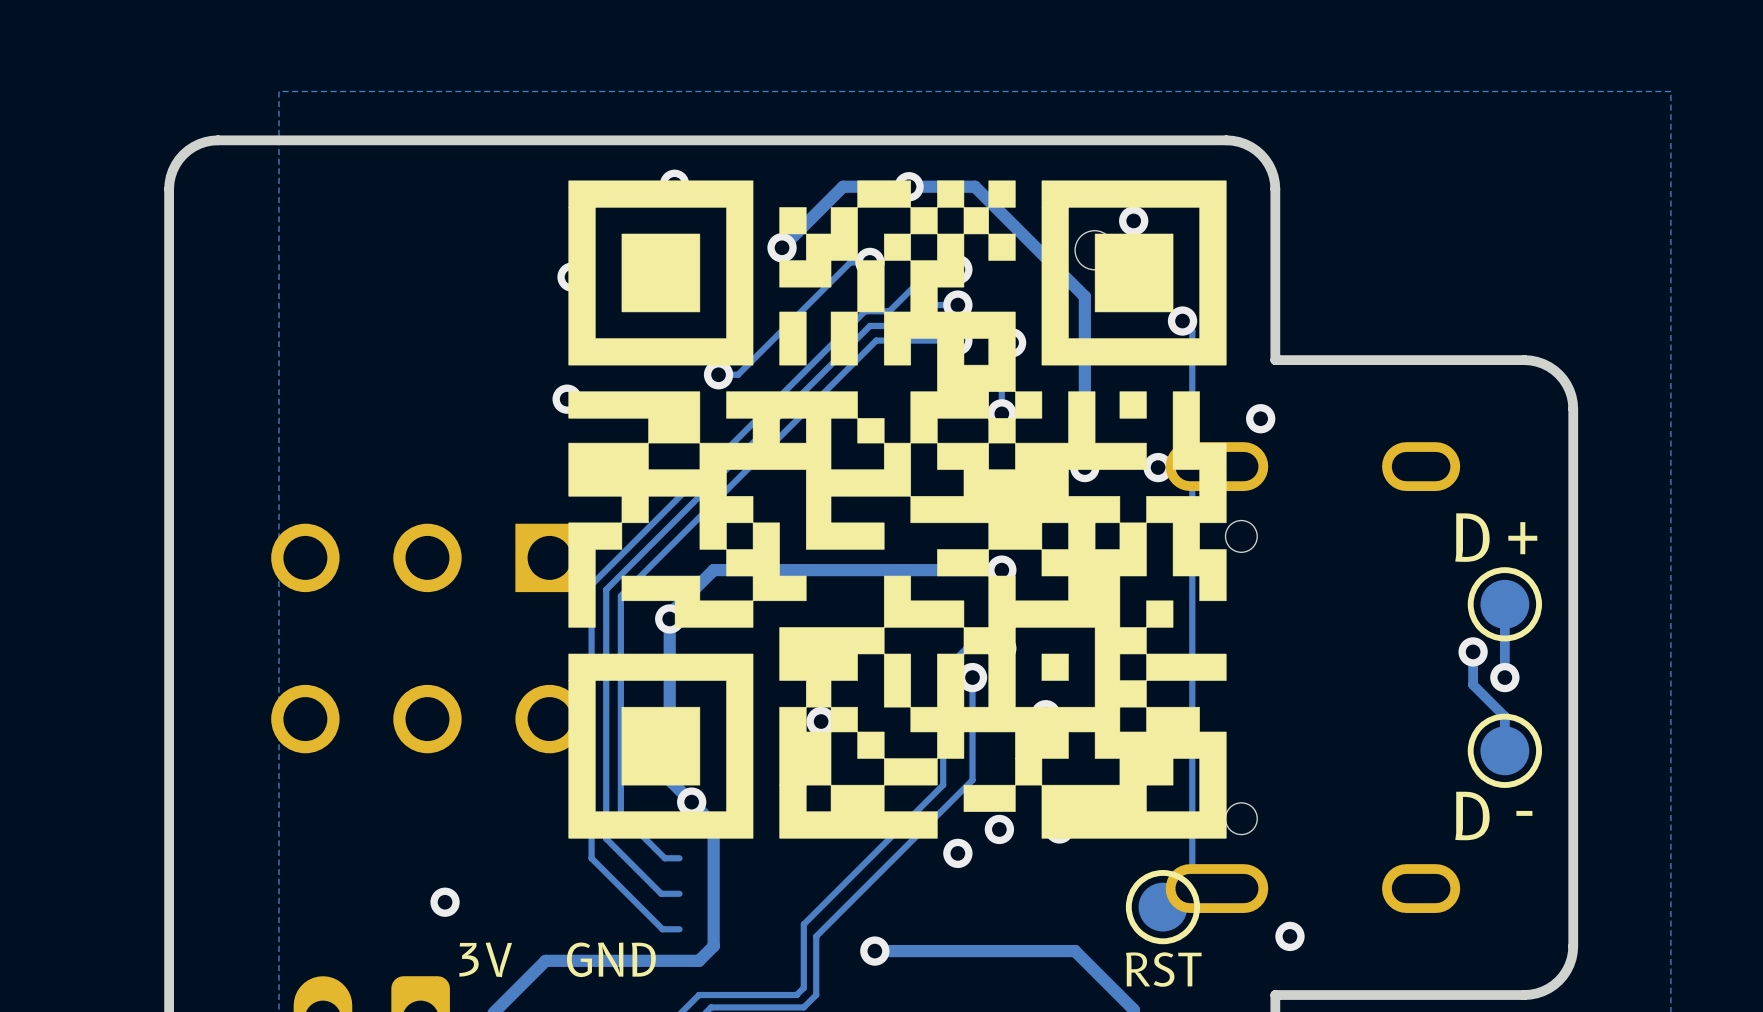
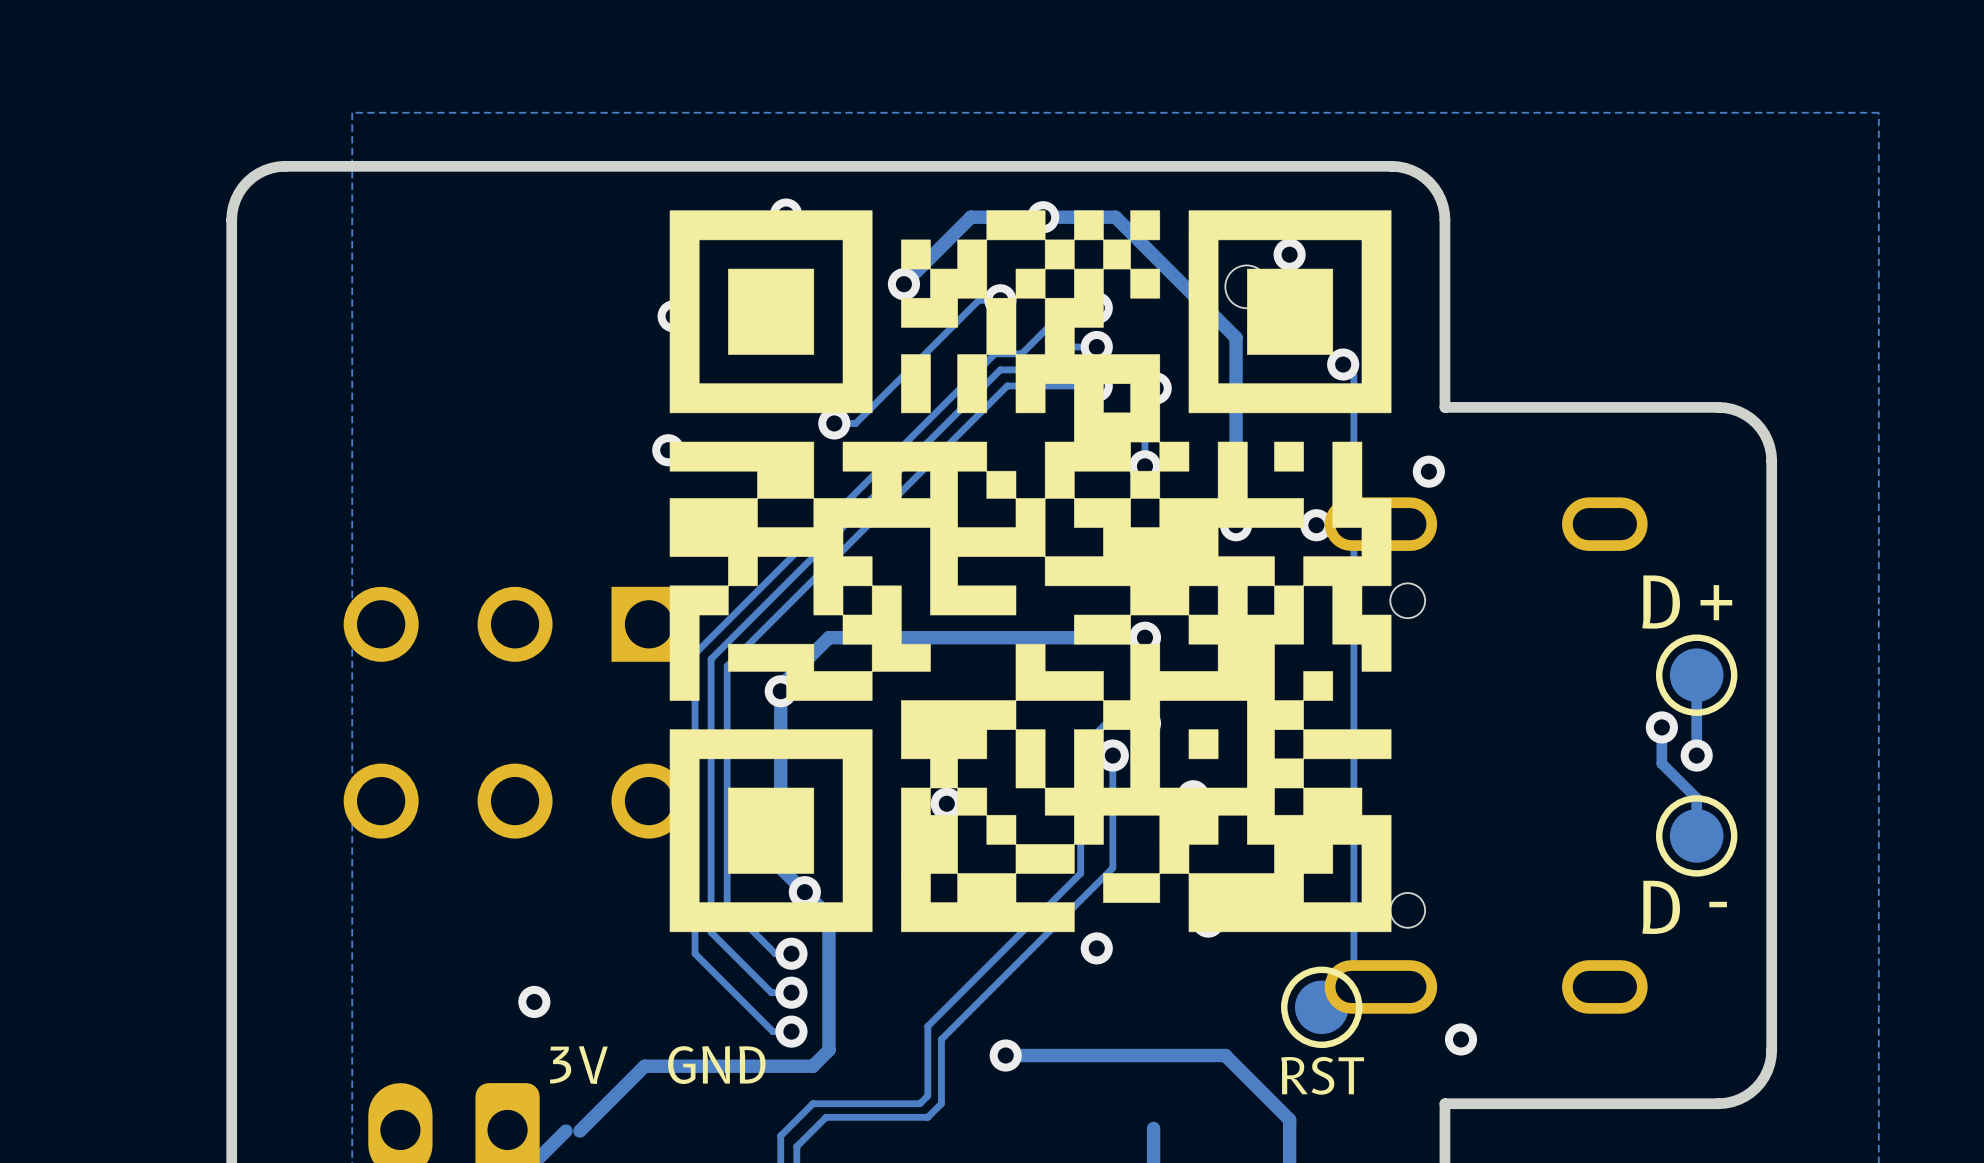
via: (999, 829) -> none
via: none -> (791, 953)
via: none -> (791, 992)
via: none -> (791, 1031)

